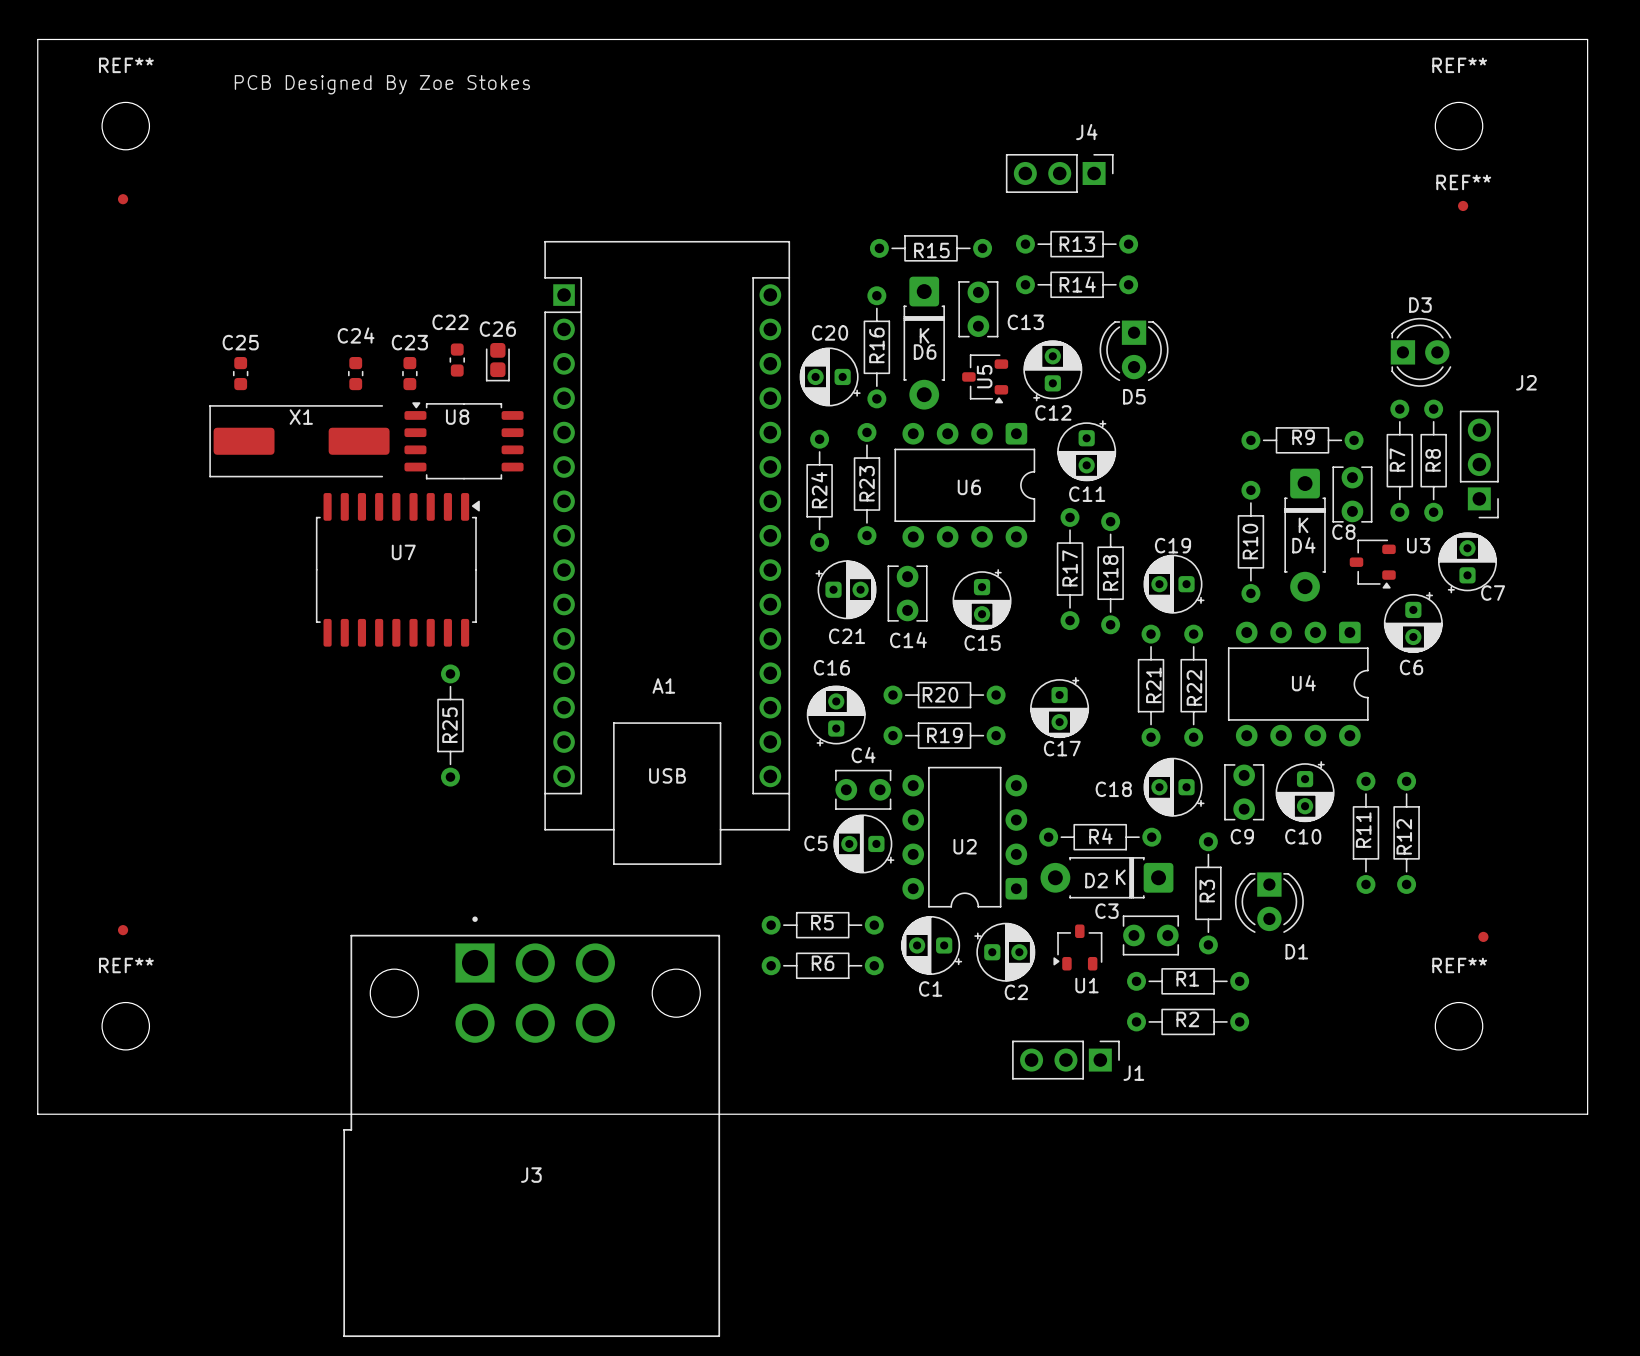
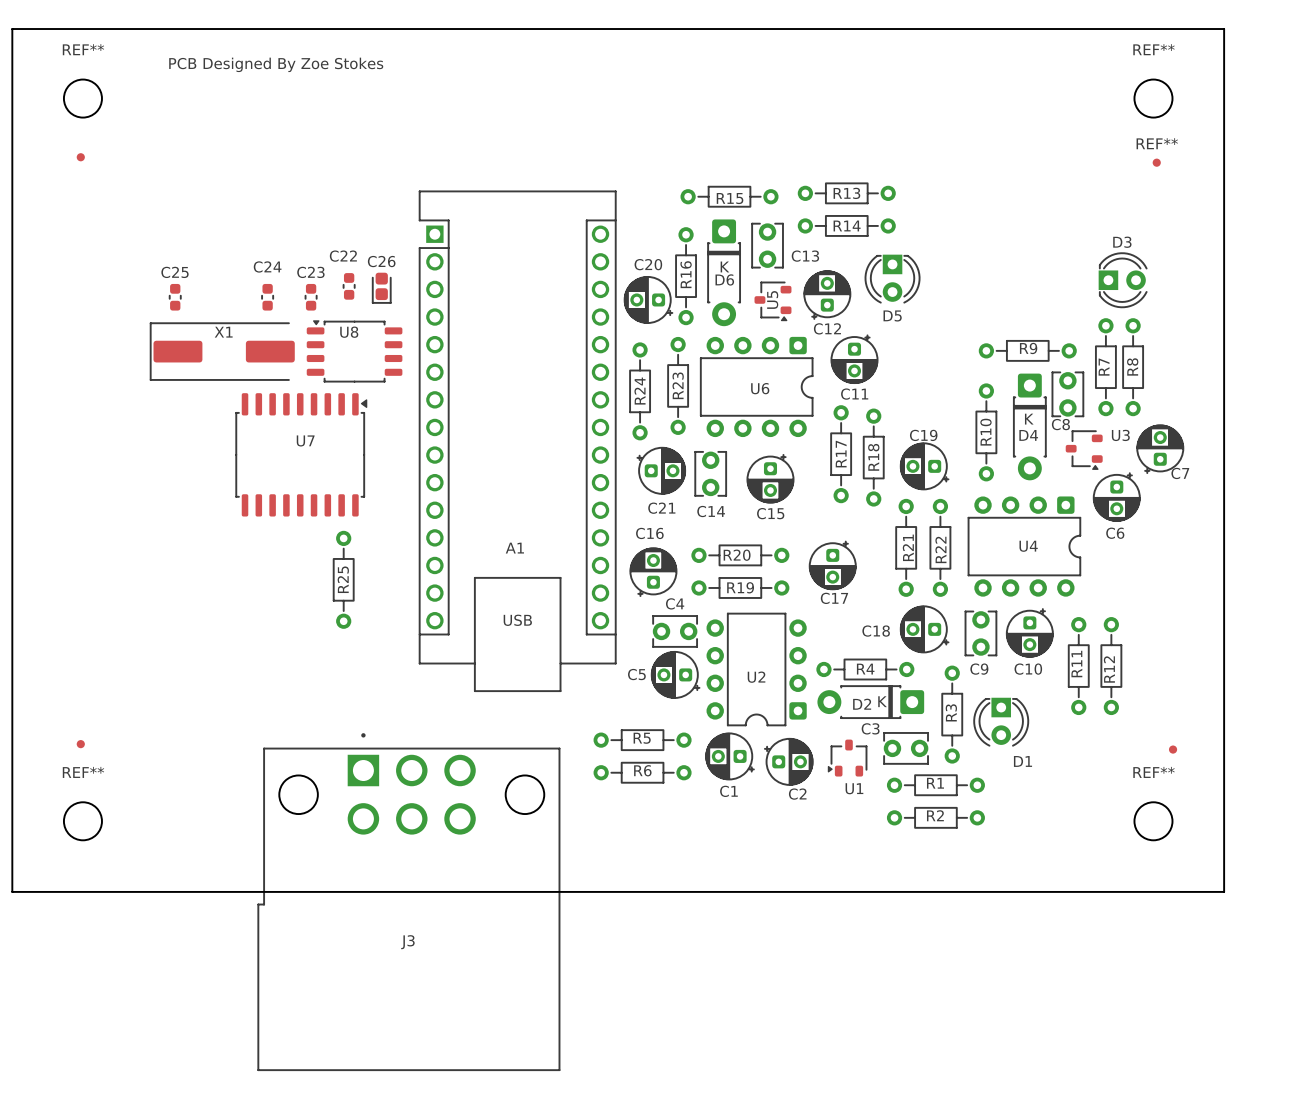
board edge: (1547, 39) (1587, 39) (1587, 1114) (1547, 1114) -> (1224, 29) (1224, 891)
J4: (1059, 173) -> none
J2: (1479, 464) -> none
J1: (1065, 1060) -> none

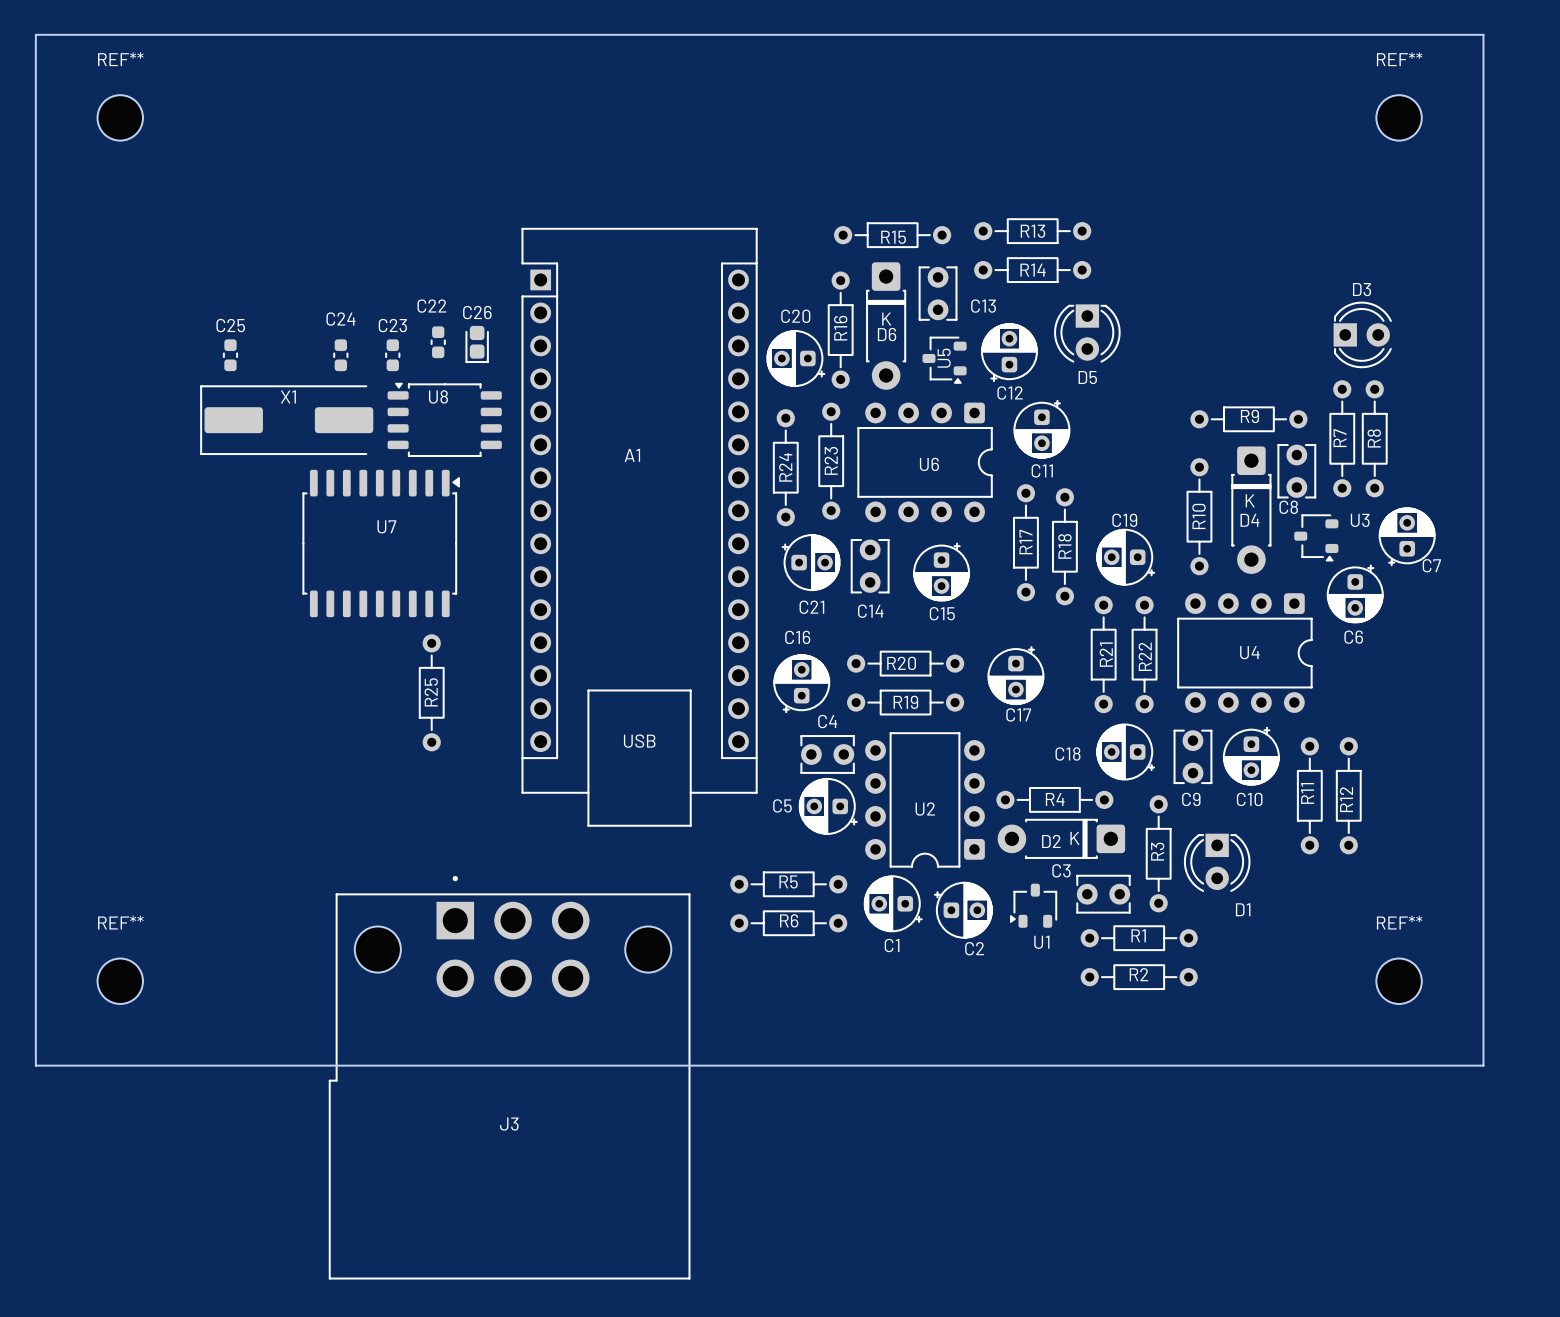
text: PCB Designed By Zoe Stokes (276, 64) -> none
part: (80, 157) -> none
REF**: (1156, 162) -> none
A1 name position: A1 (514, 548) -> A1 (632, 455)
part: (80, 744) -> none
part: (1173, 749) -> none

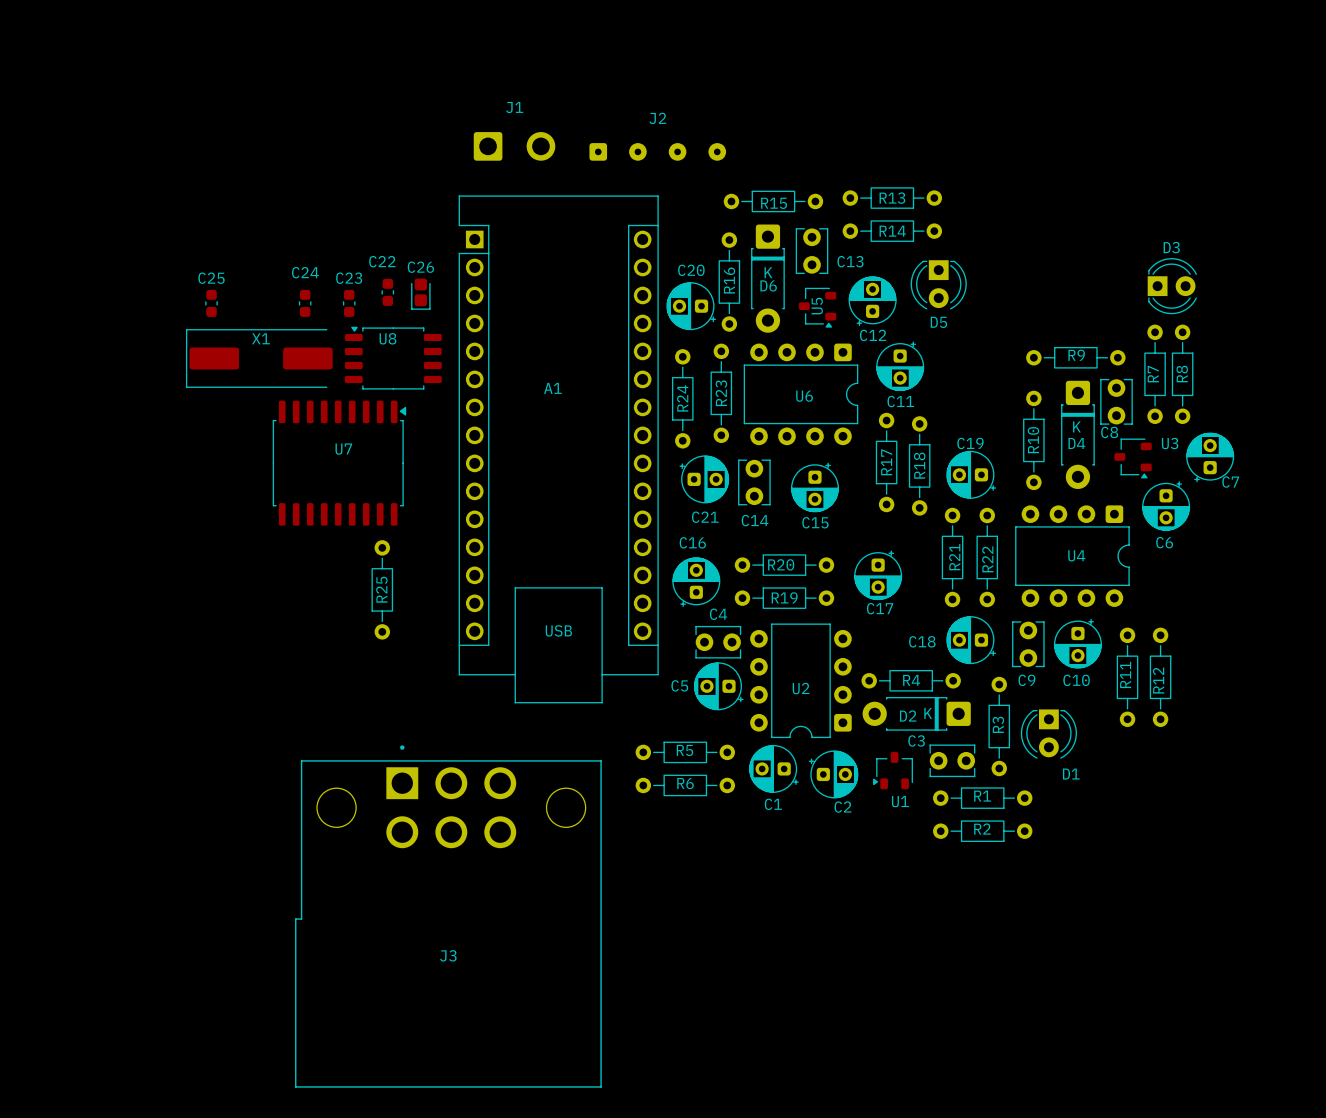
board edge: (35, 34) (1483, 34) (1483, 1065) (35, 1065) (35, 34) -> none
REF**: (120, 117) -> none
REF**: (1399, 117) -> none
J1: none -> (514, 146)
J2: none -> (657, 151)
REF**: (120, 981) -> none
REF**: (1399, 981) -> none

